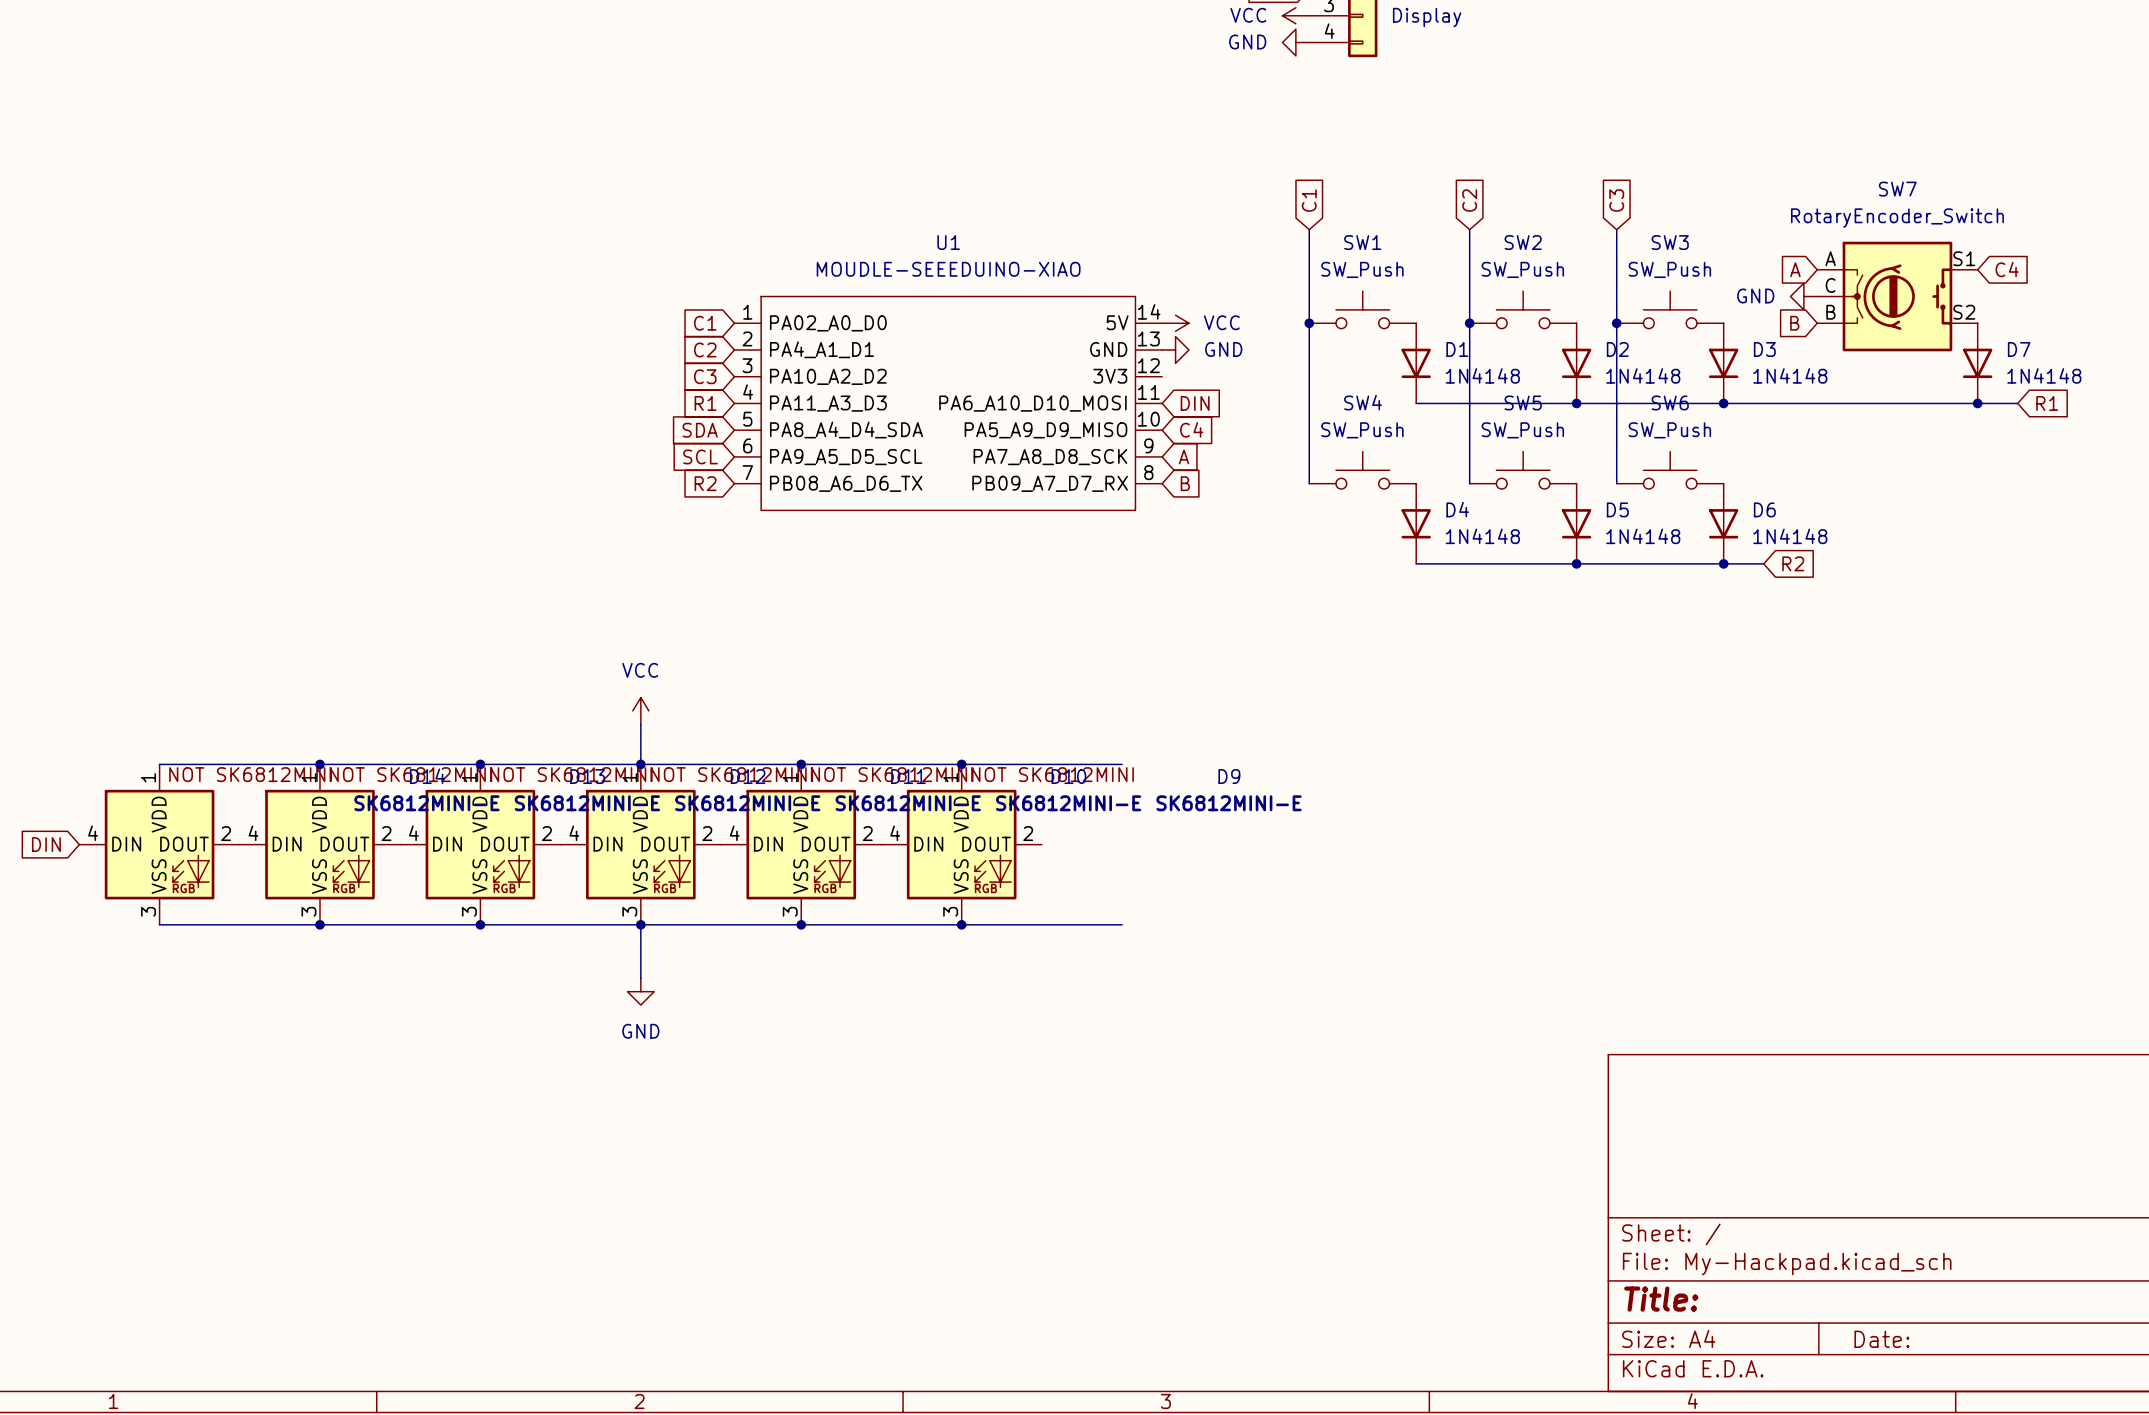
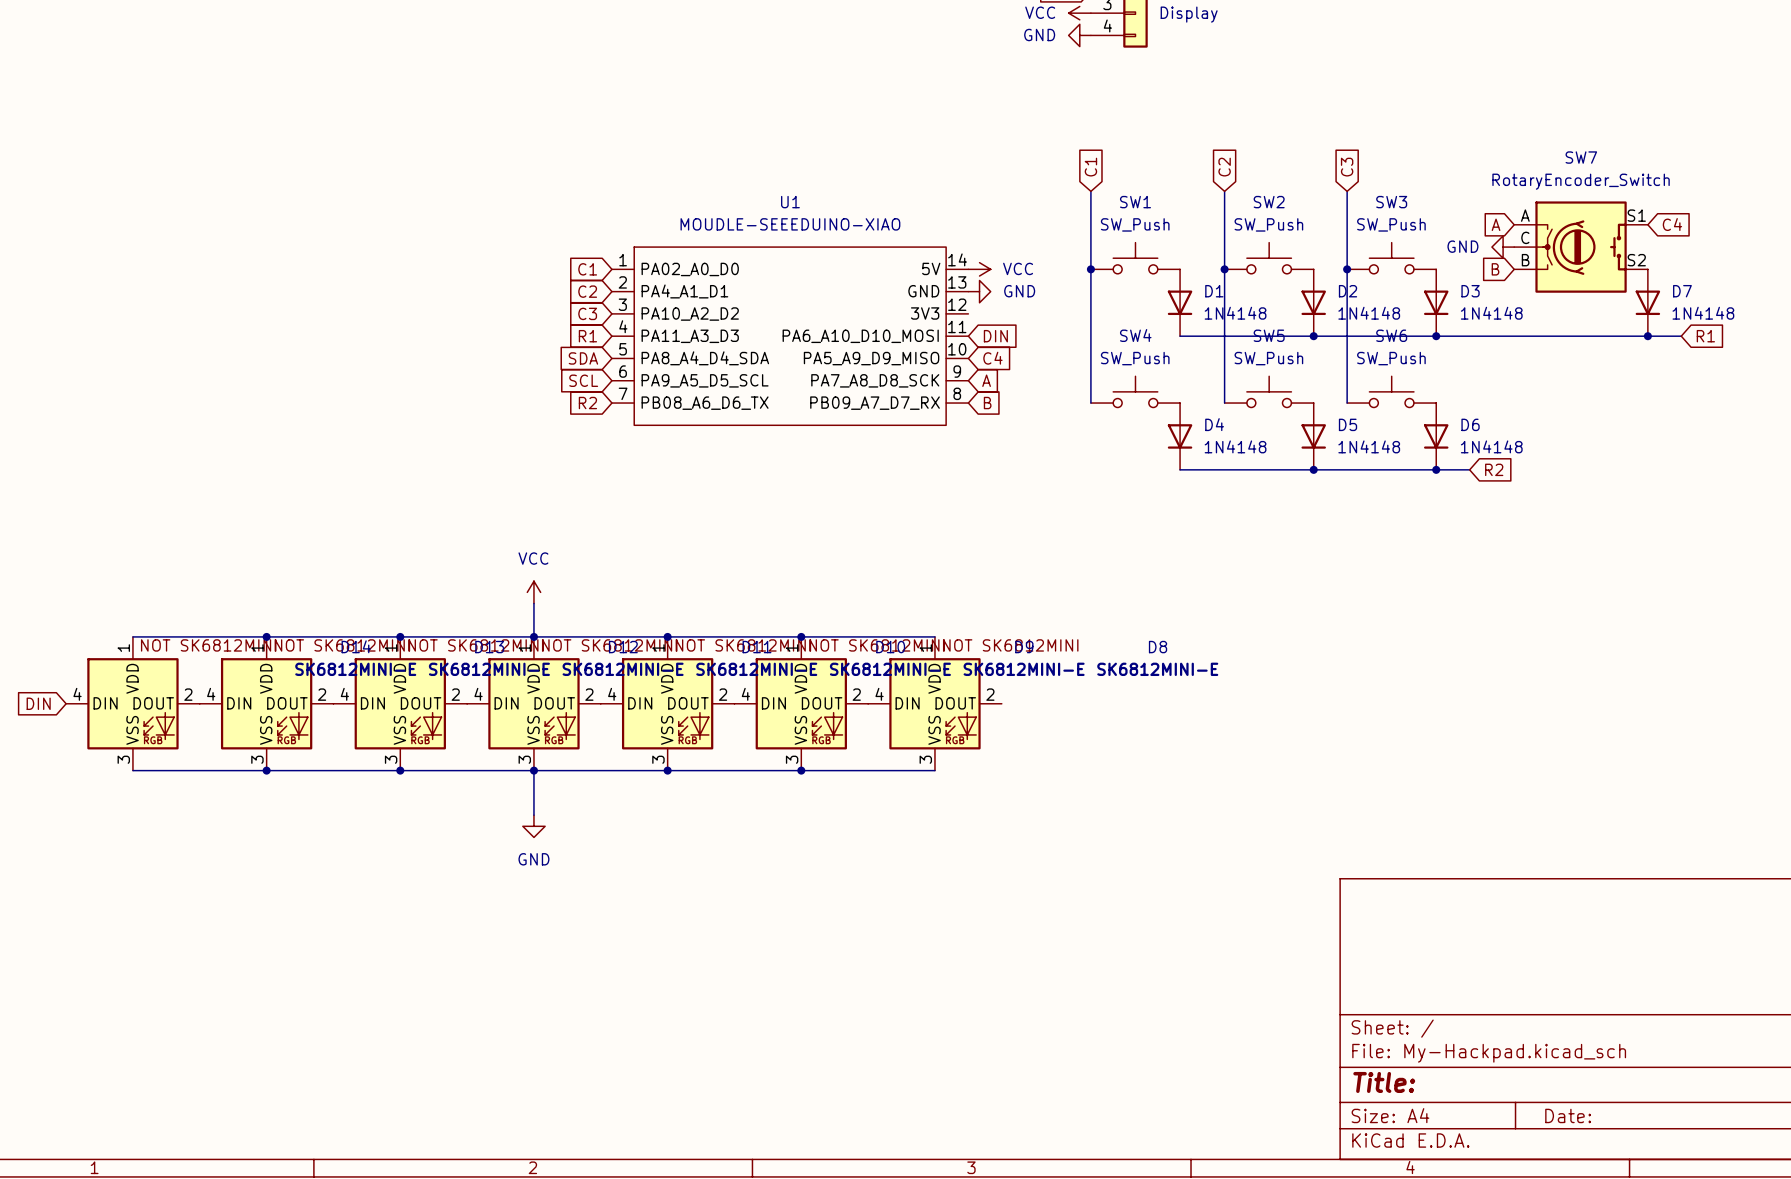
D8: none -> SK6812MINI-E (934, 703)

